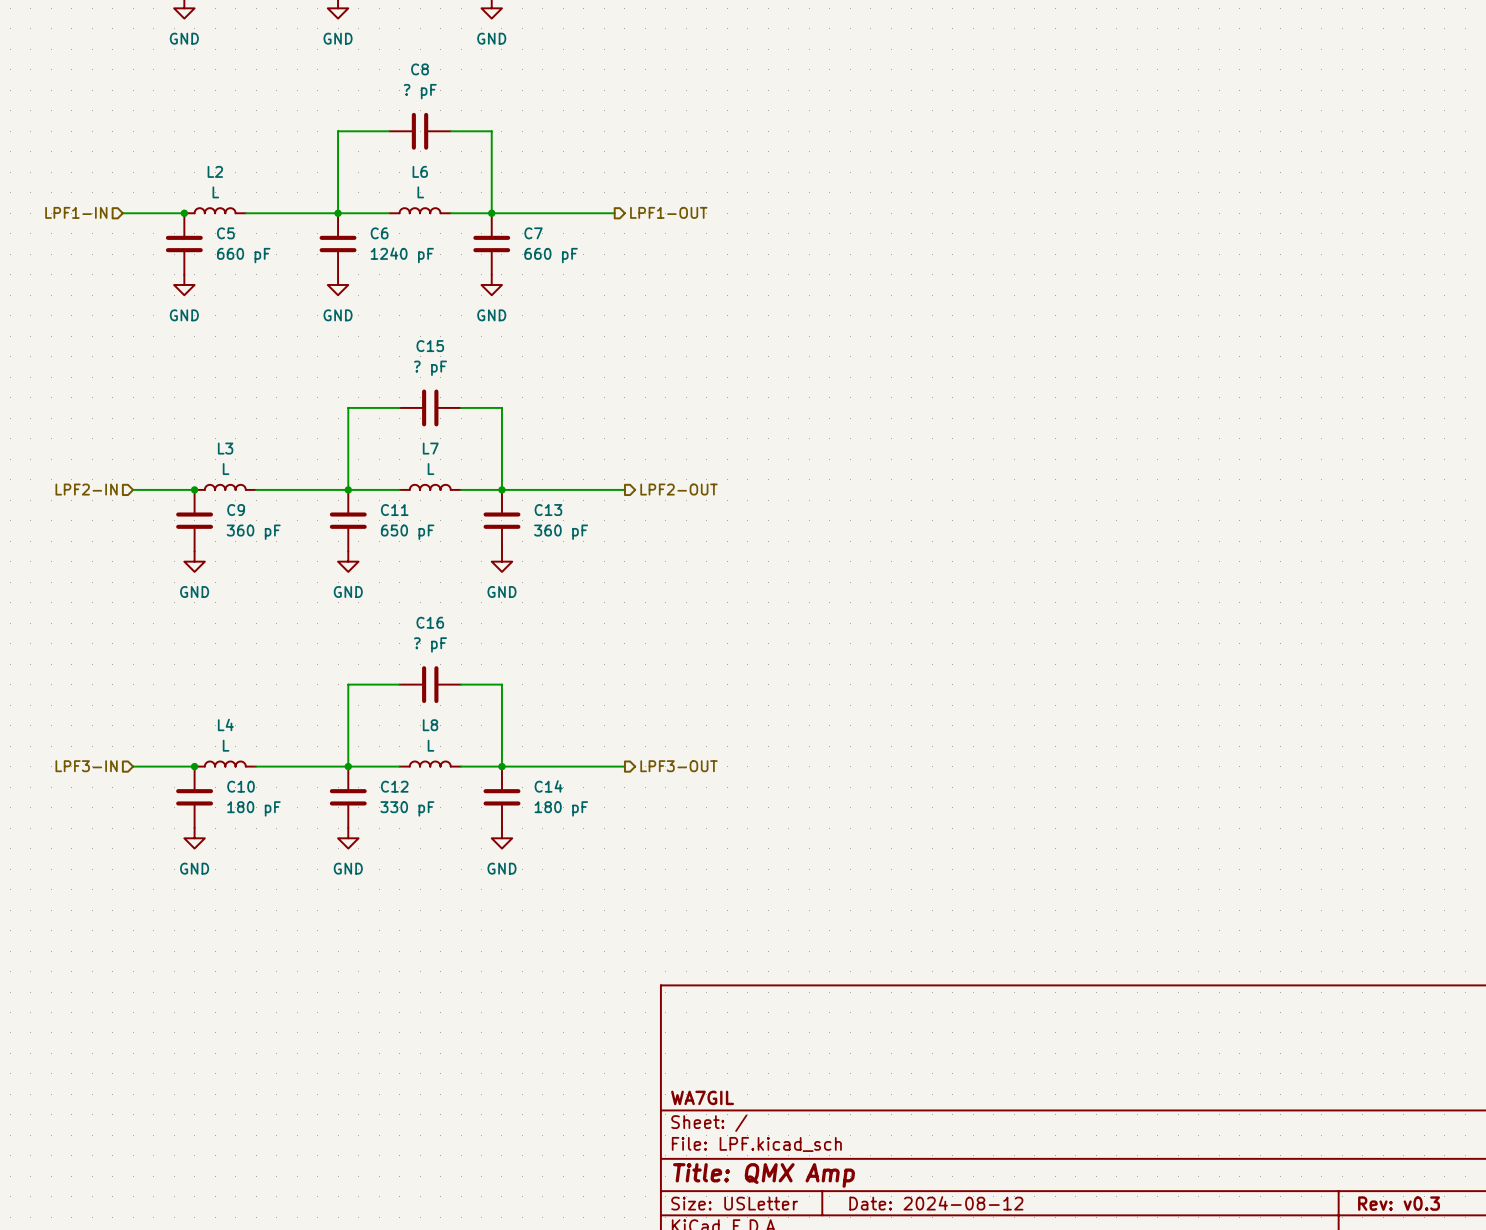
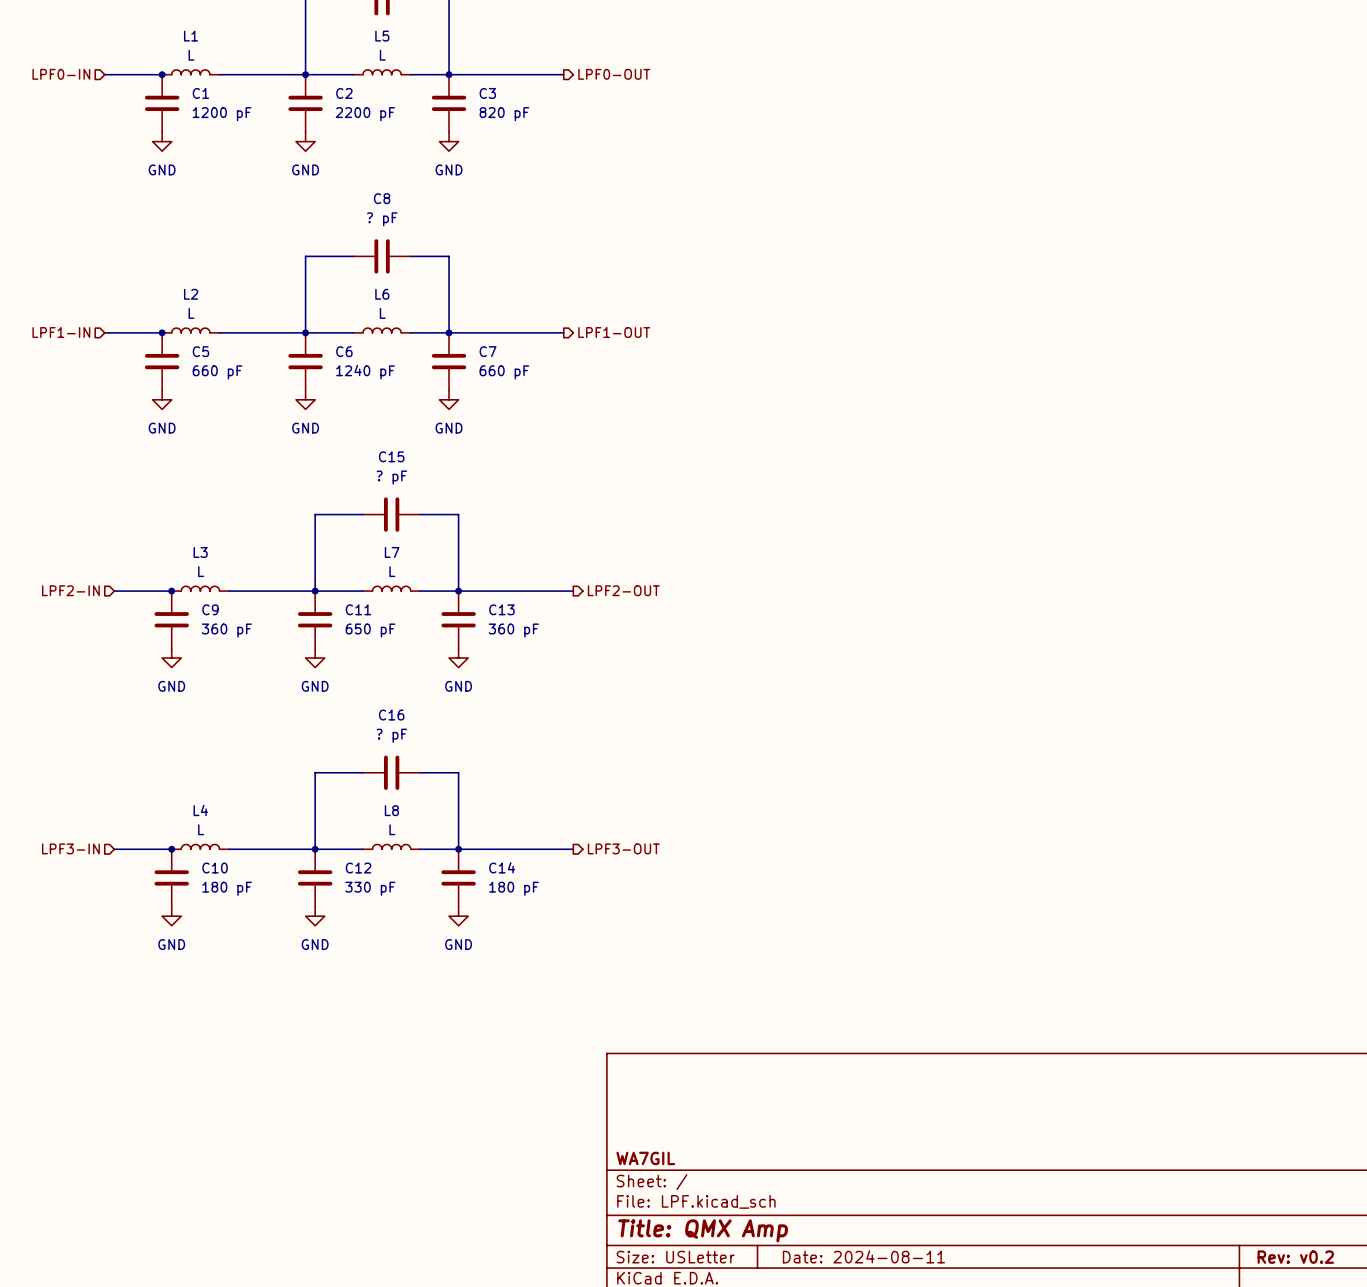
title block: Date: 2024-08-12 (936, 1203) -> Date: 2024-08-11 (863, 1256)
title block: Rev: v0.3 (1399, 1203) -> Rev: v0.2 (1295, 1257)

